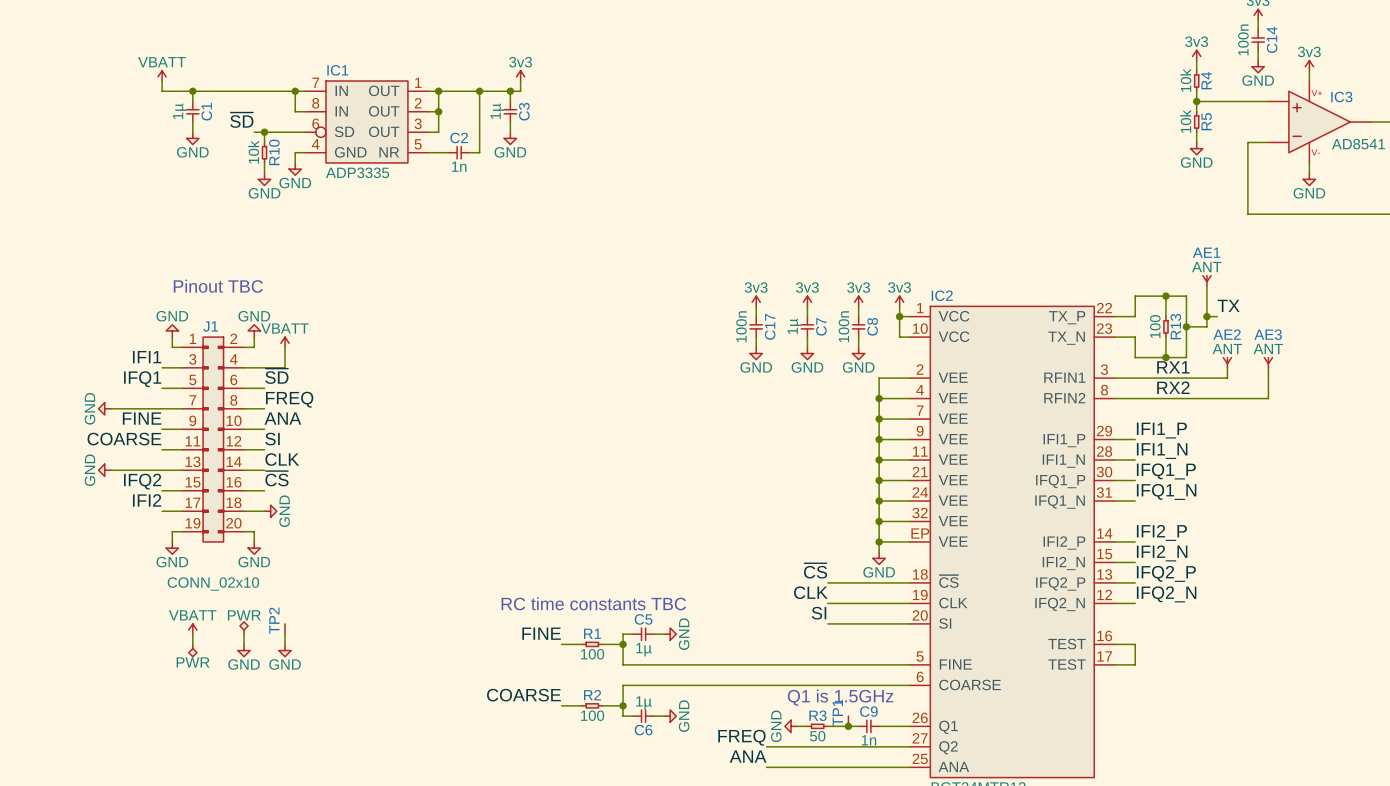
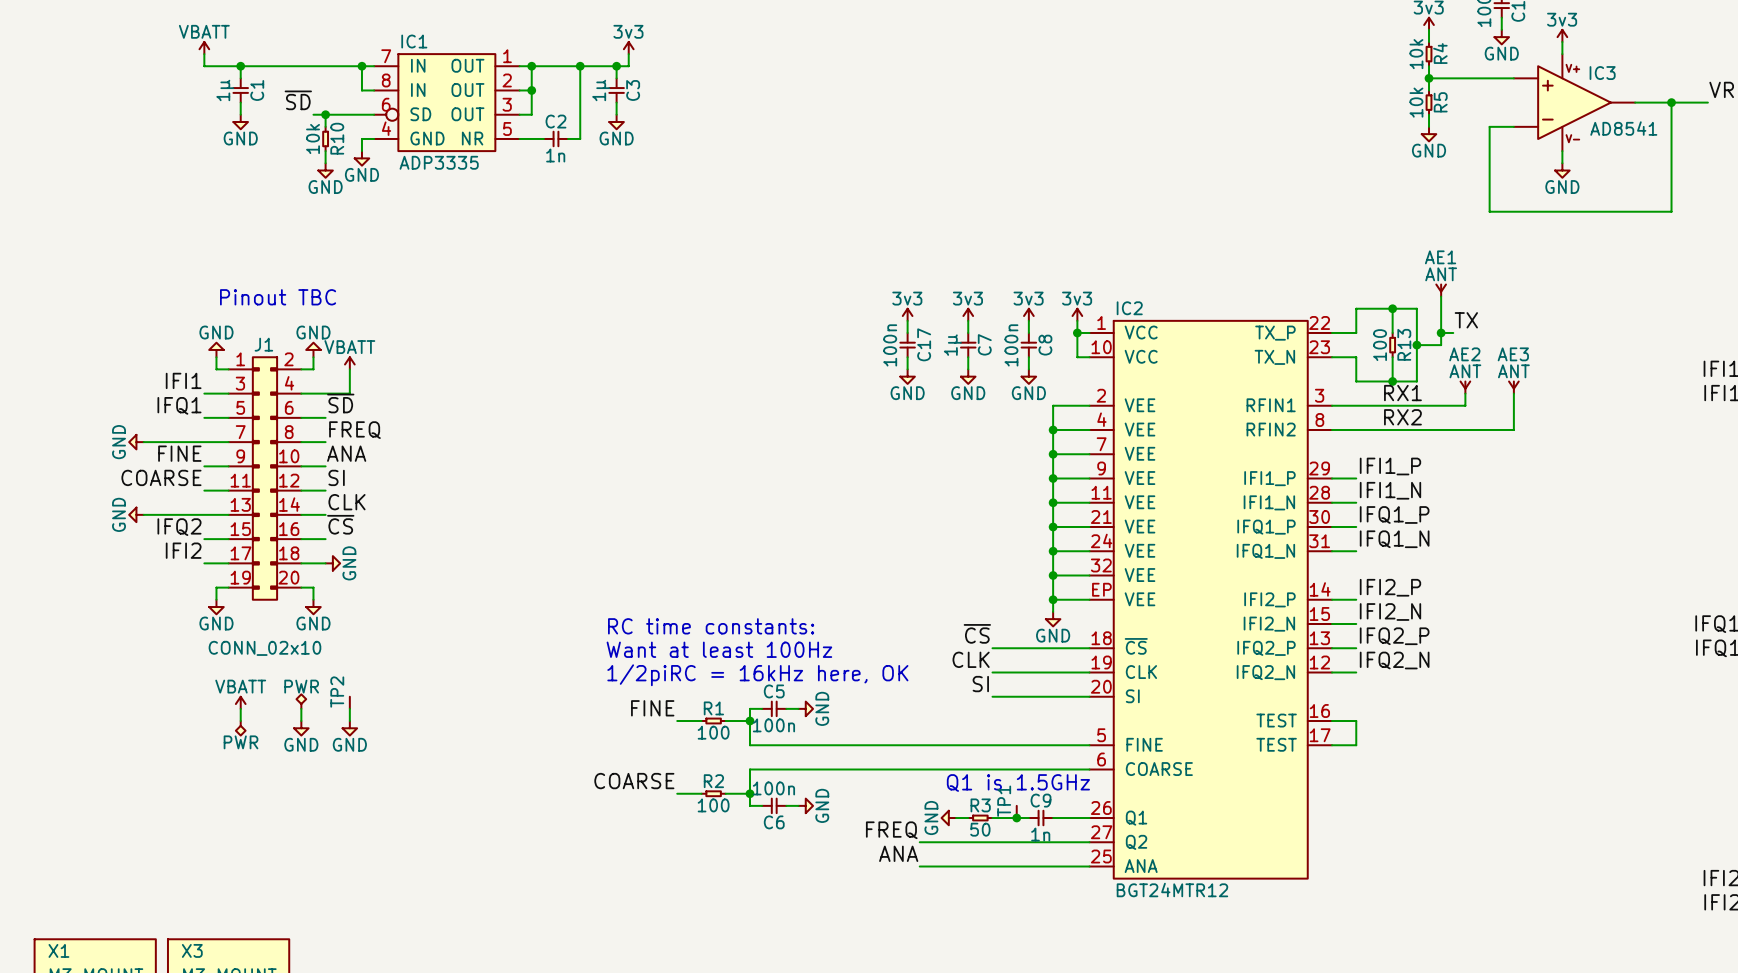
text: none -> RC time constants: (711, 626)
text: none -> Want at least 100Hz (719, 649)
text: RC time constants TBC (593, 603) -> 1/2piRC = 16kHz here, OK (757, 675)
C5 value: 1µ (643, 649) -> 100n (773, 725)
C6 value: 1µ (643, 702) -> 100n (773, 788)

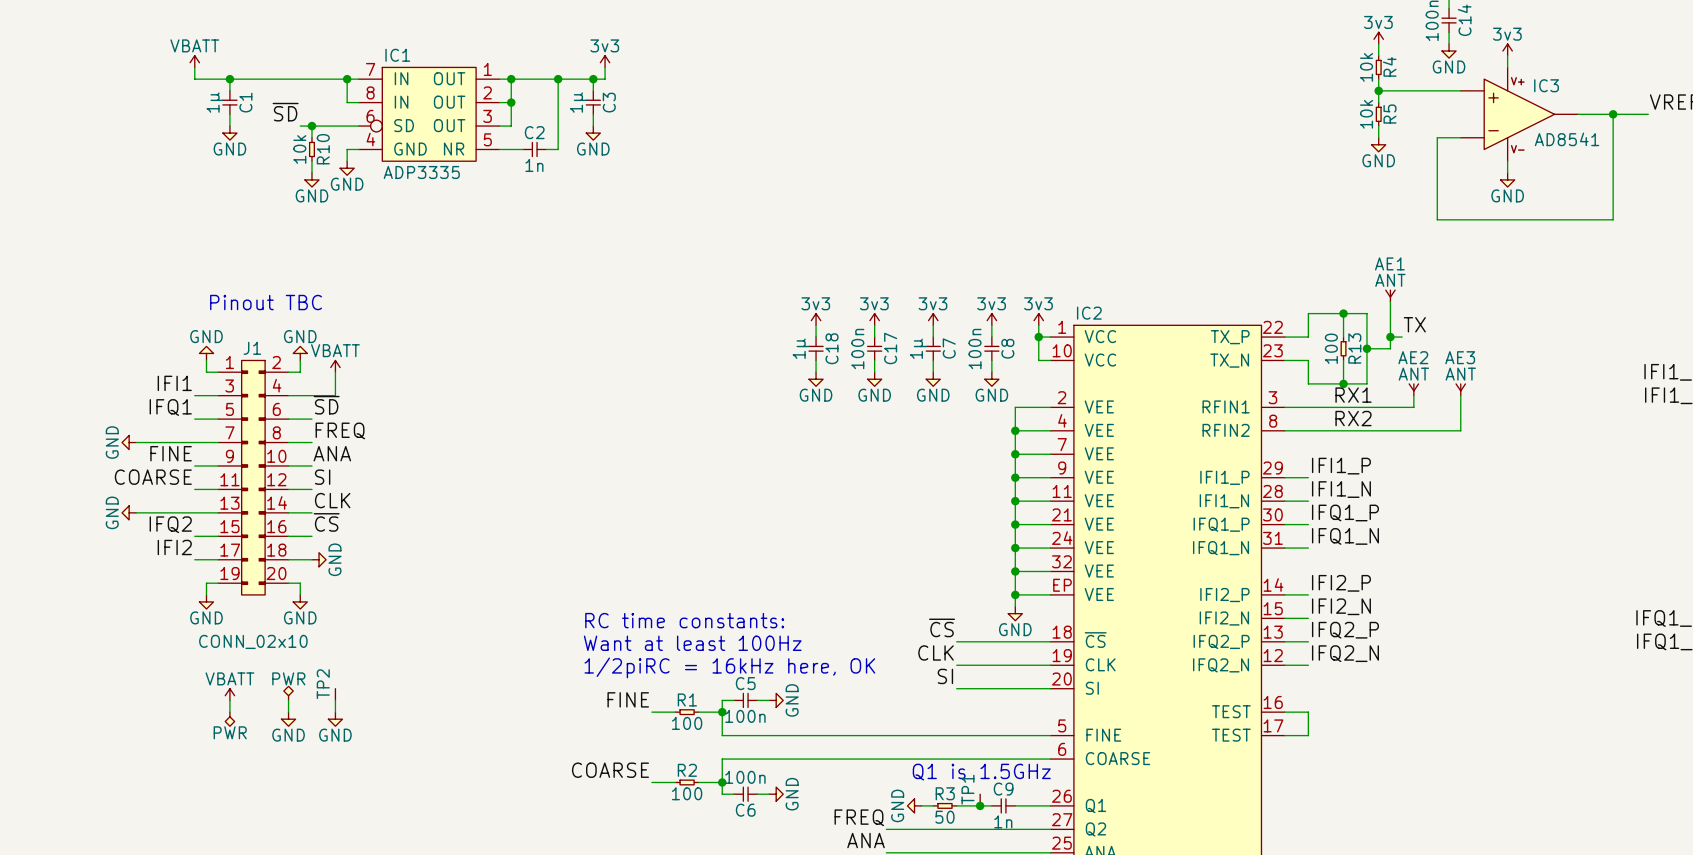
power symbol: none -> 3v3 (816, 319)
wire: none -> (816, 325) (816, 337)
C18: none -> 1µ (816, 348)
wire: none -> (816, 360) (816, 372)
power symbol: none -> GND (816, 379)

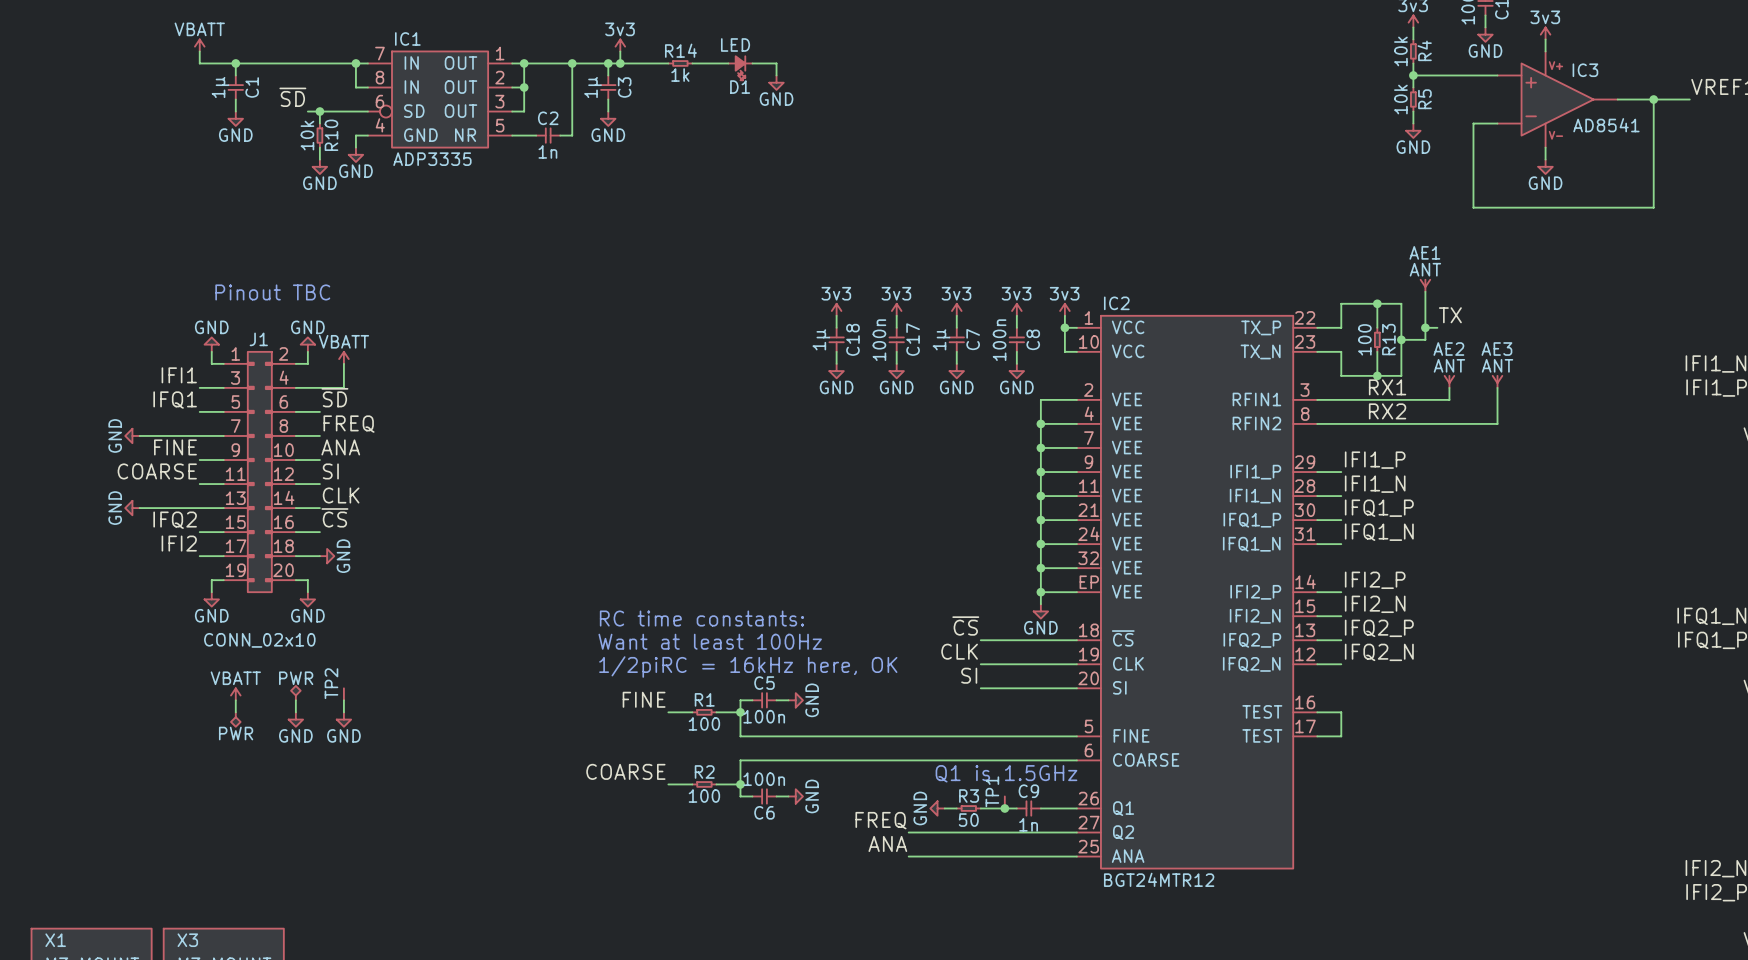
wire: none -> (620, 63) (668, 63)
junction: none -> (620, 63)
R14: none -> 1k (680, 63)
wire: none -> (692, 63) (728, 63)
wire: none -> (752, 63) (776, 63) (776, 75)
D1: none -> LED (740, 68)
power symbol: none -> GND (776, 82)

